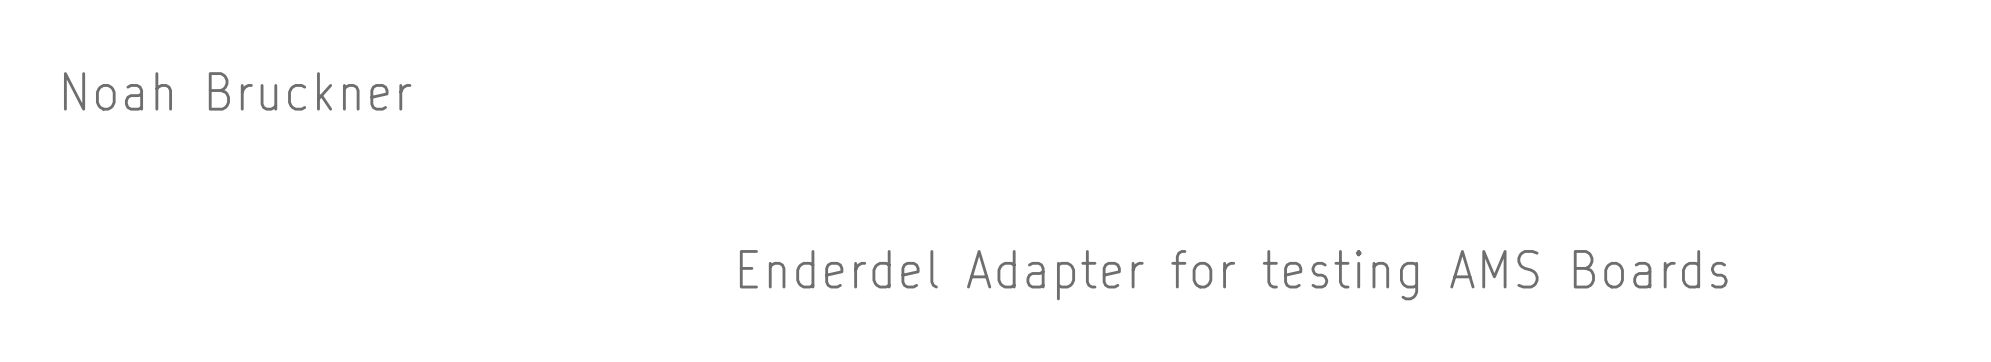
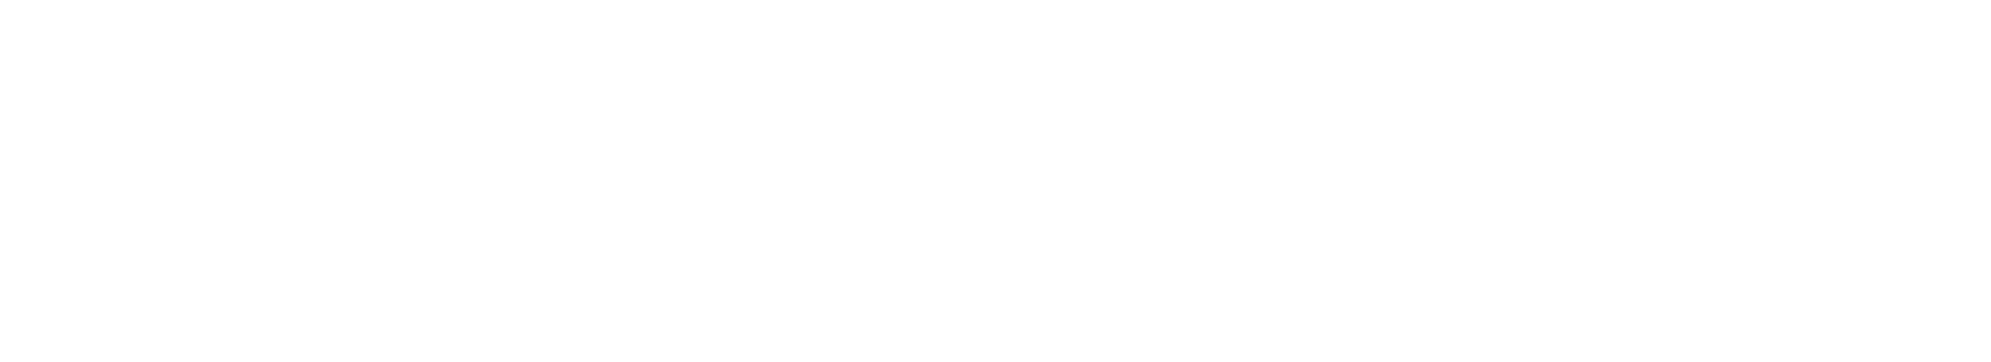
text: Noah Bruckner (237, 91) -> none
text: Enderdel Adapter for testing AMS Boards (1233, 275) -> none

